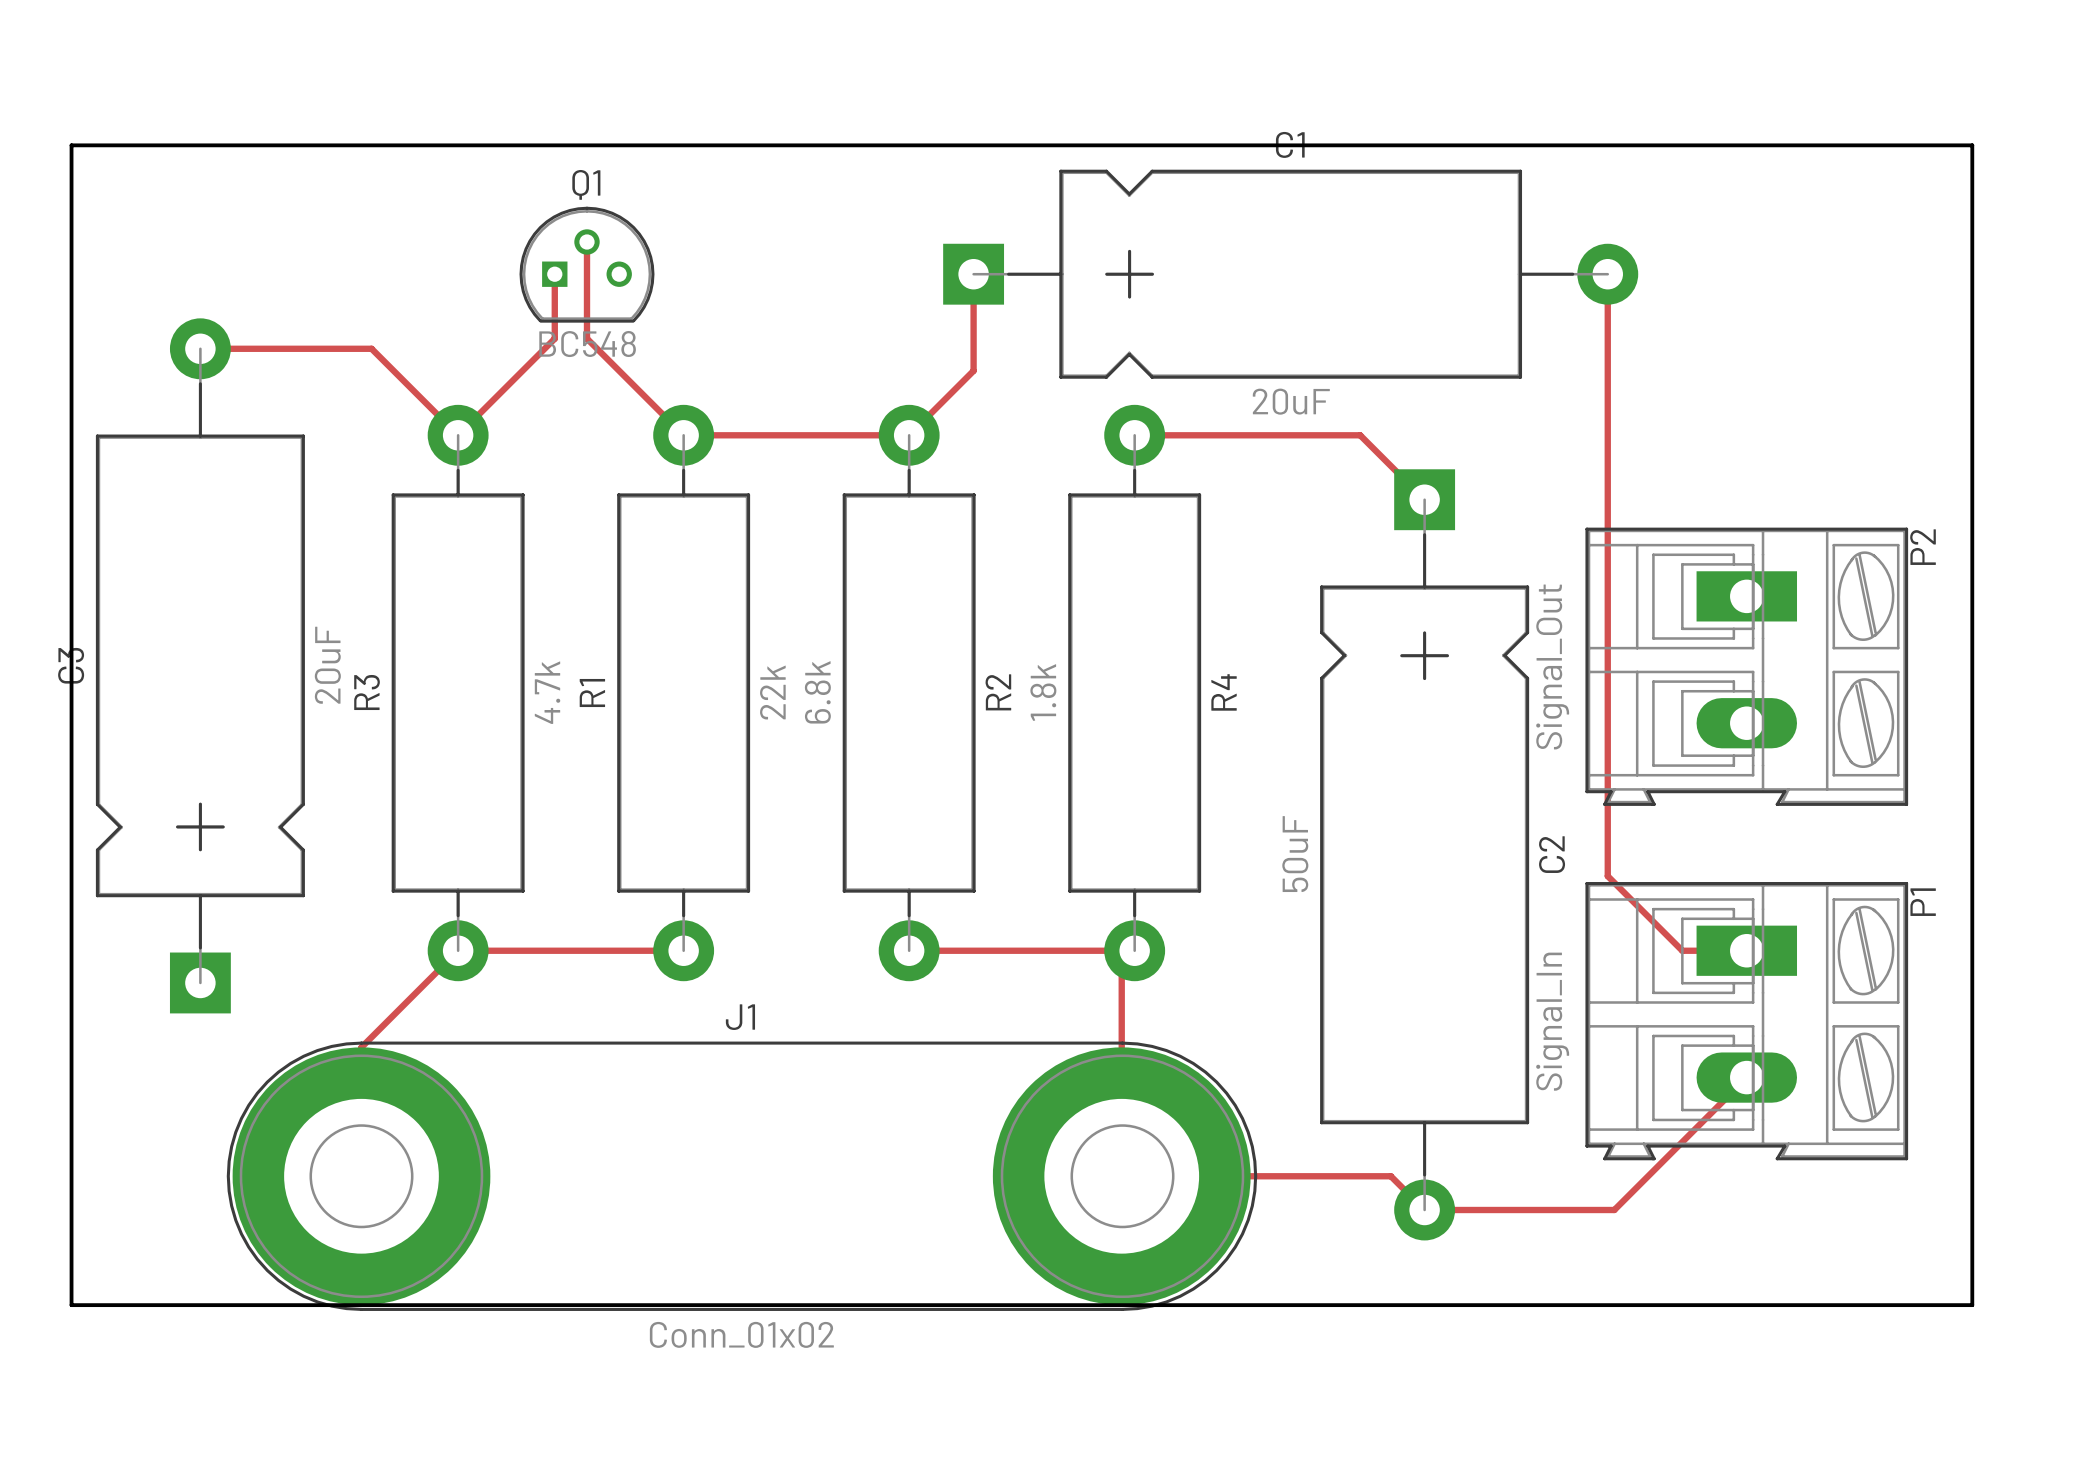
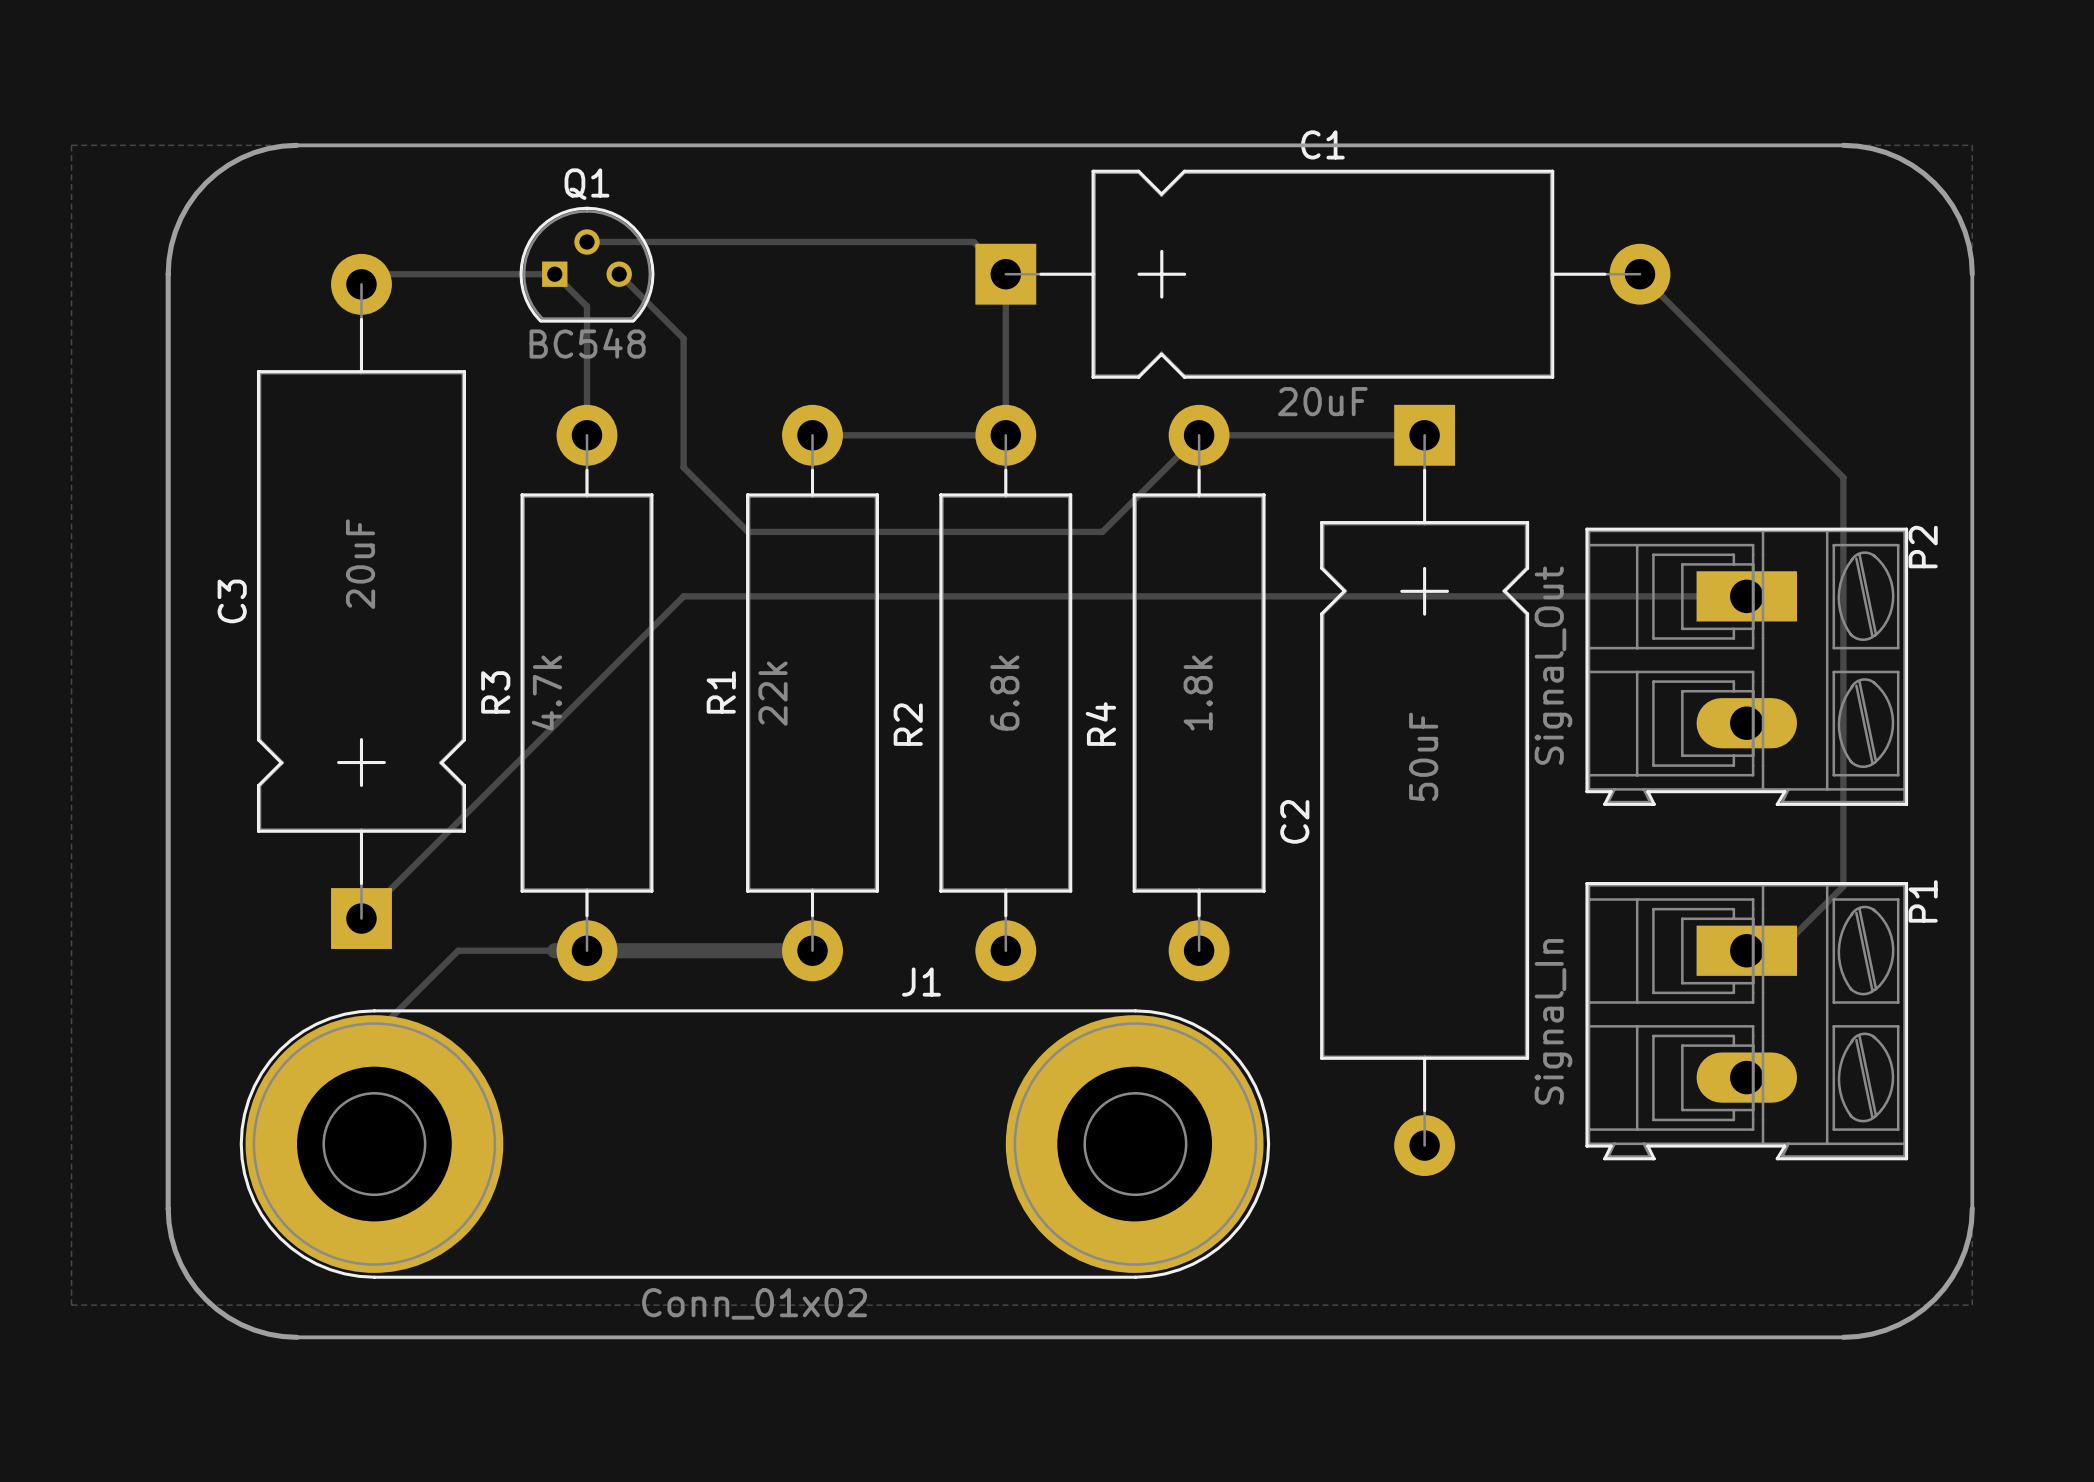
board edge: (297, 145) (71, 145) (71, 1305) (1972, 1305) (1972, 1208) -> (296, 145) (268, 148) (254, 152) (240, 158) (216, 173) (196, 193) (180, 218) (175, 231) (168, 259) (169, 1222) (175, 1251) (187, 1277) (205, 1299) (228, 1317) (254, 1330) (268, 1334) (297, 1337) (1857, 1336) (1872, 1334) (1899, 1324) (1923, 1309) (1934, 1299) (1952, 1277) (1965, 1251) (1969, 1237) (1972, 1208)
board edge: (1843, 145) (1972, 145) (1972, 274) -> (1843, 145) (1872, 148) (1899, 158) (1923, 173) (1934, 183) (1952, 205) (1959, 218) (1969, 245) (1972, 274)
track: (587, 241) (587, 306) -> (361, 284) (371, 274) (554, 274) (587, 306)
track: (554, 274) (554, 338) (458, 435) (371, 348) (200, 348) -> none
track: (973, 274) (973, 370) (909, 435) -> (587, 241) (973, 241) (1005, 274) (1005, 435) (909, 435)
C1 position: (1290, 274) -> (1322, 274)
track: (1607, 274) (1607, 876) (1682, 950) (1746, 950) -> (1639, 274) (1843, 477) (1843, 886) (1778, 950) (1746, 950)
track: (587, 338) (683, 435) (812, 435) -> (587, 338) (587, 435)
track: (1134, 435) (1199, 435) -> (619, 274) (683, 338) (683, 467) (748, 531) (1102, 531) (1199, 435)
track: (1360, 435) (1424, 499) -> (1360, 435) (1424, 435)
track: none -> (1746, 596) (683, 596) (361, 918)
C3 position: (200, 665) -> (361, 601)
C3 value position: 20uF (327, 665) -> 20uF (360, 564)
R2 value position: 6.8k (817, 692) -> 6.8k (1004, 693)
R2 name position: R2 (998, 692) -> R2 (908, 724)
R4 value position: 1.8k (1043, 692) -> 1.8k (1198, 693)
R4 name position: R4 (1224, 692) -> R4 (1100, 724)
R3 position: (458, 693) -> (587, 693)
R1 position: (683, 693) -> (812, 693)
R2 position: (909, 693) -> (1005, 693)
R4 position: (1134, 693) -> (1199, 693)
C2 value position: 50uF (1295, 854) -> 50uF (1423, 756)
C2 position: (1424, 854) -> (1424, 790)
C2 name position: C2 (1552, 854) -> C2 (1294, 821)
track width: thin (554, 950) (683, 950) -> thick (554, 950) (683, 950)
track: none -> (683, 950) (812, 950)
track: (909, 950) (1134, 950) (1121, 963) (1121, 1176) (1390, 1176) (1424, 1210) (1614, 1210) (1746, 1077) -> none
J1 name position: J1 (740, 1017) -> J1 (921, 982)
J1 position: (741, 1176) -> (754, 1144)

